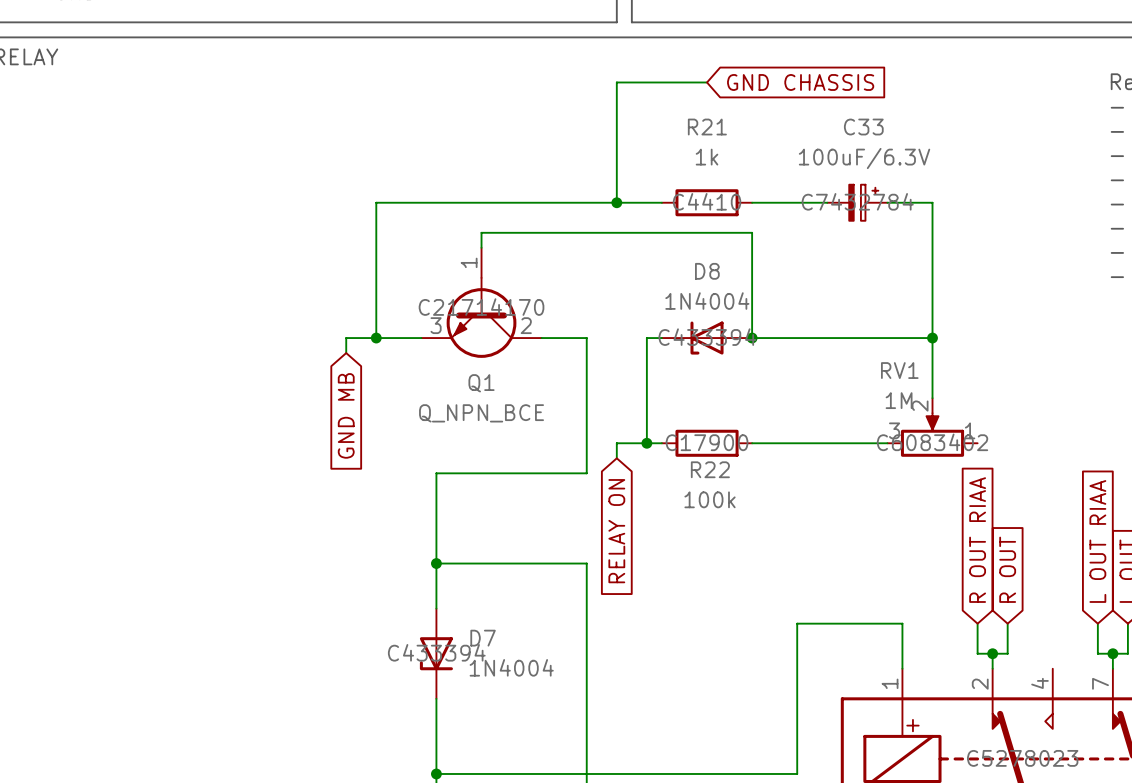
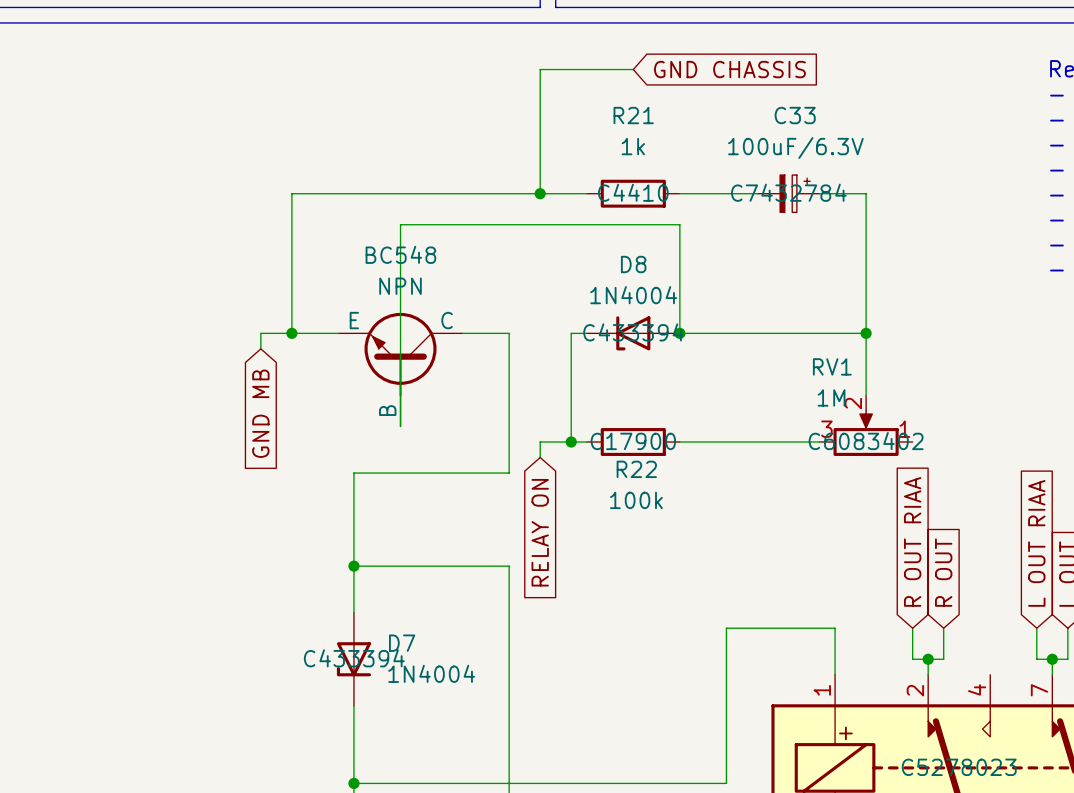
wire: none -> (400, 240) (400, 426)
Q1: Q_NPN_BCE (481, 302) -> none
BC548: none -> NPN (400, 369)

